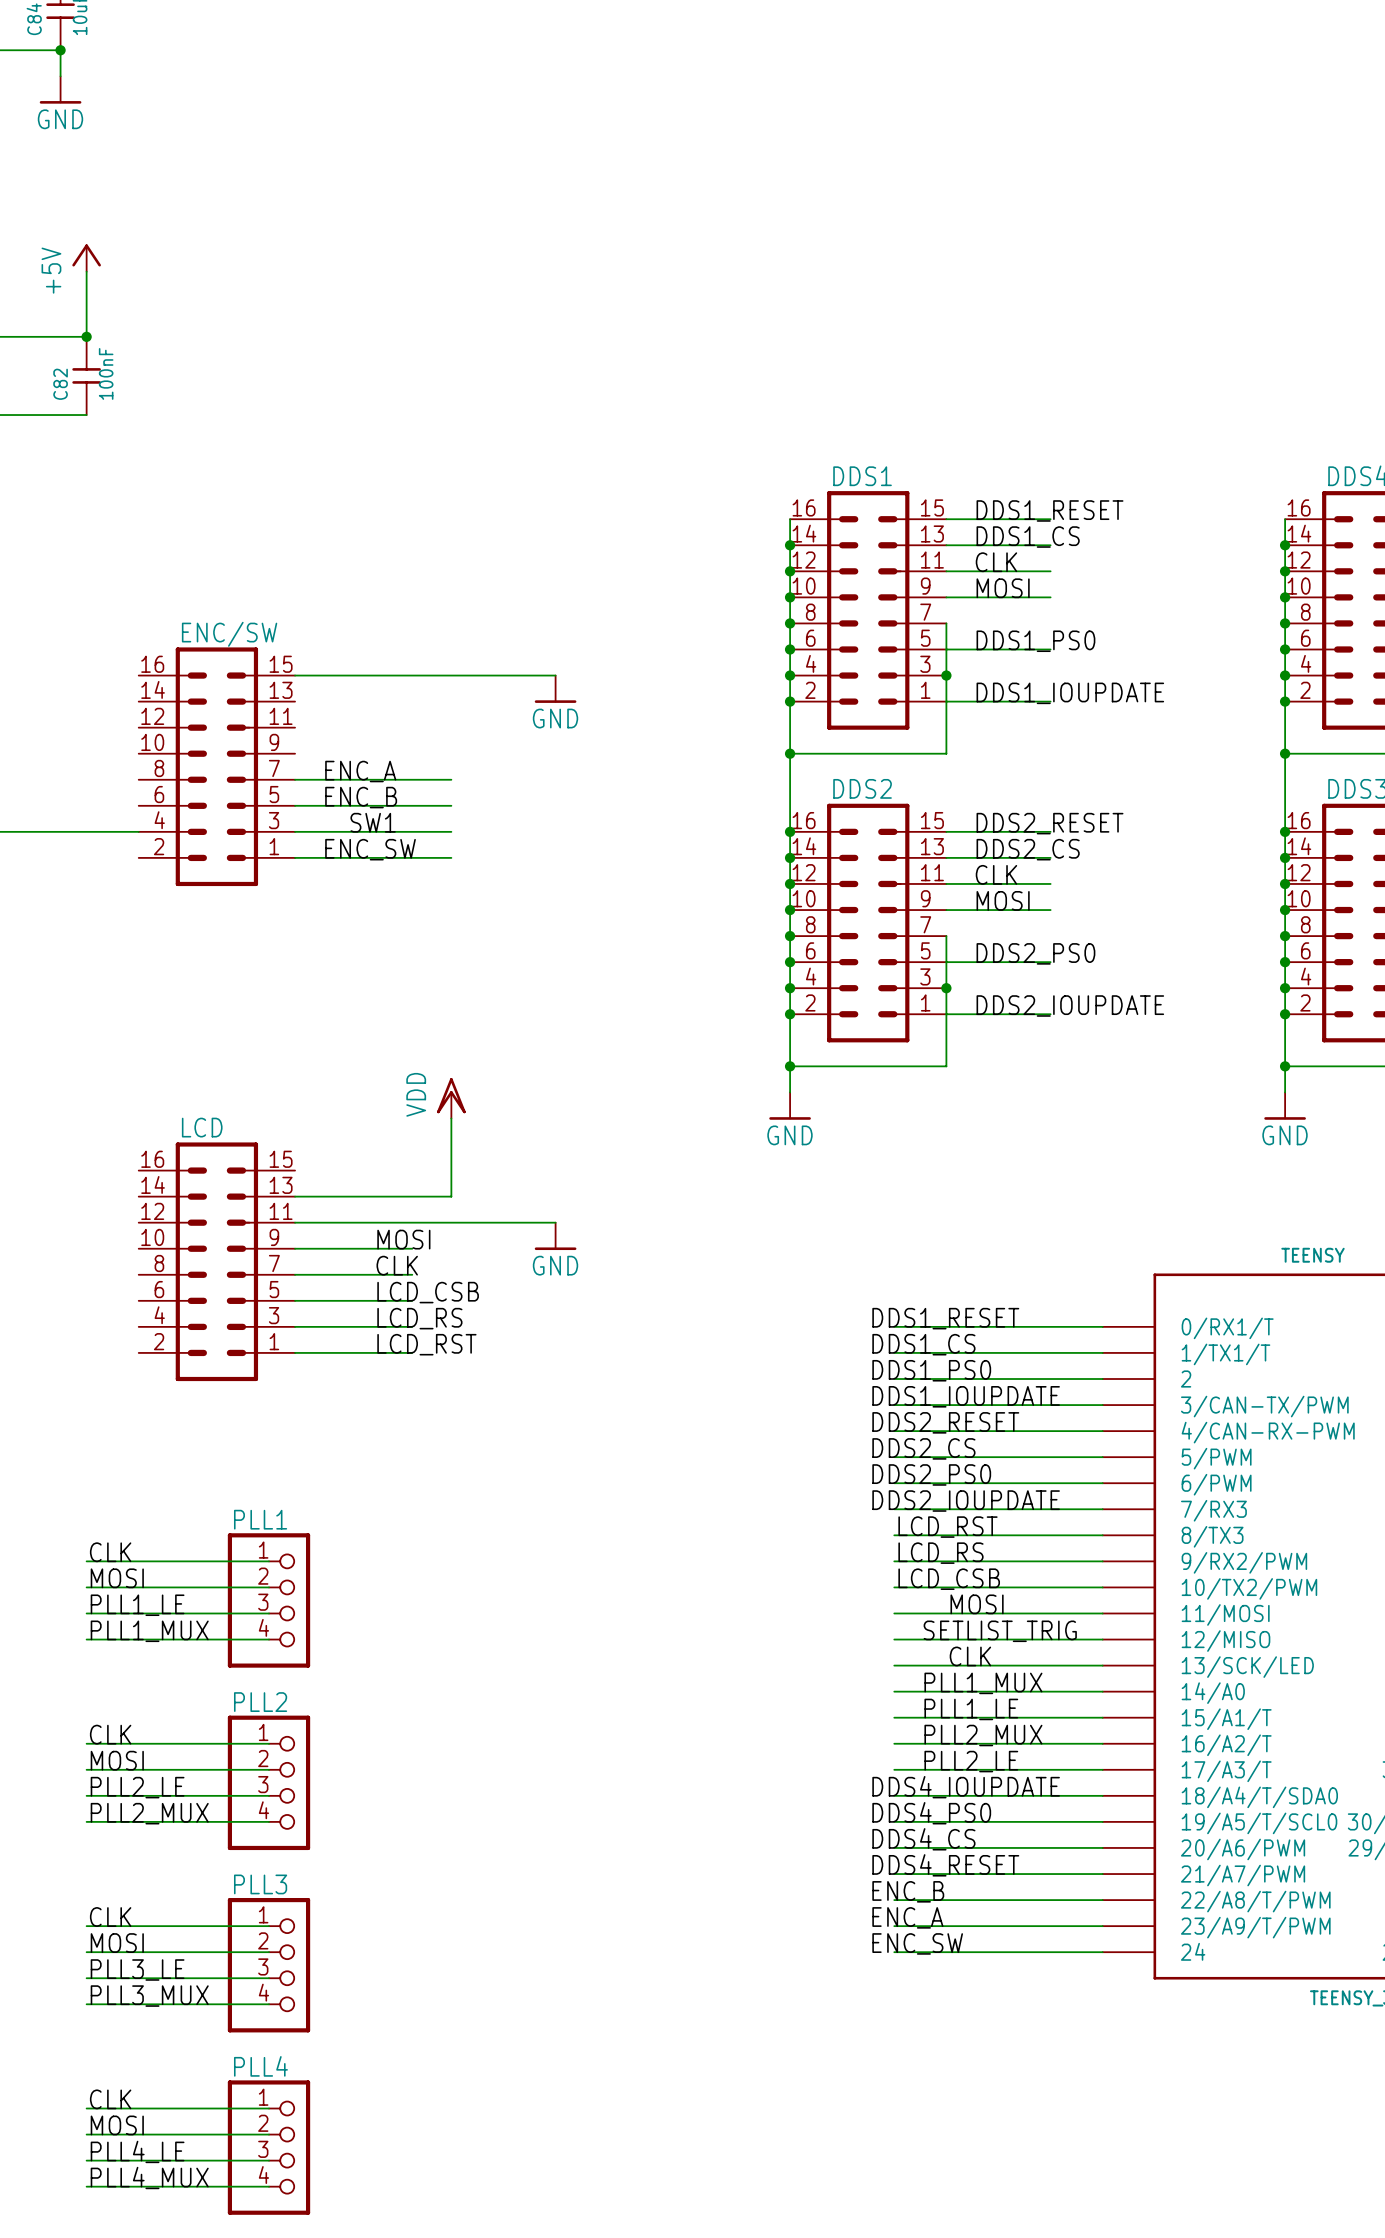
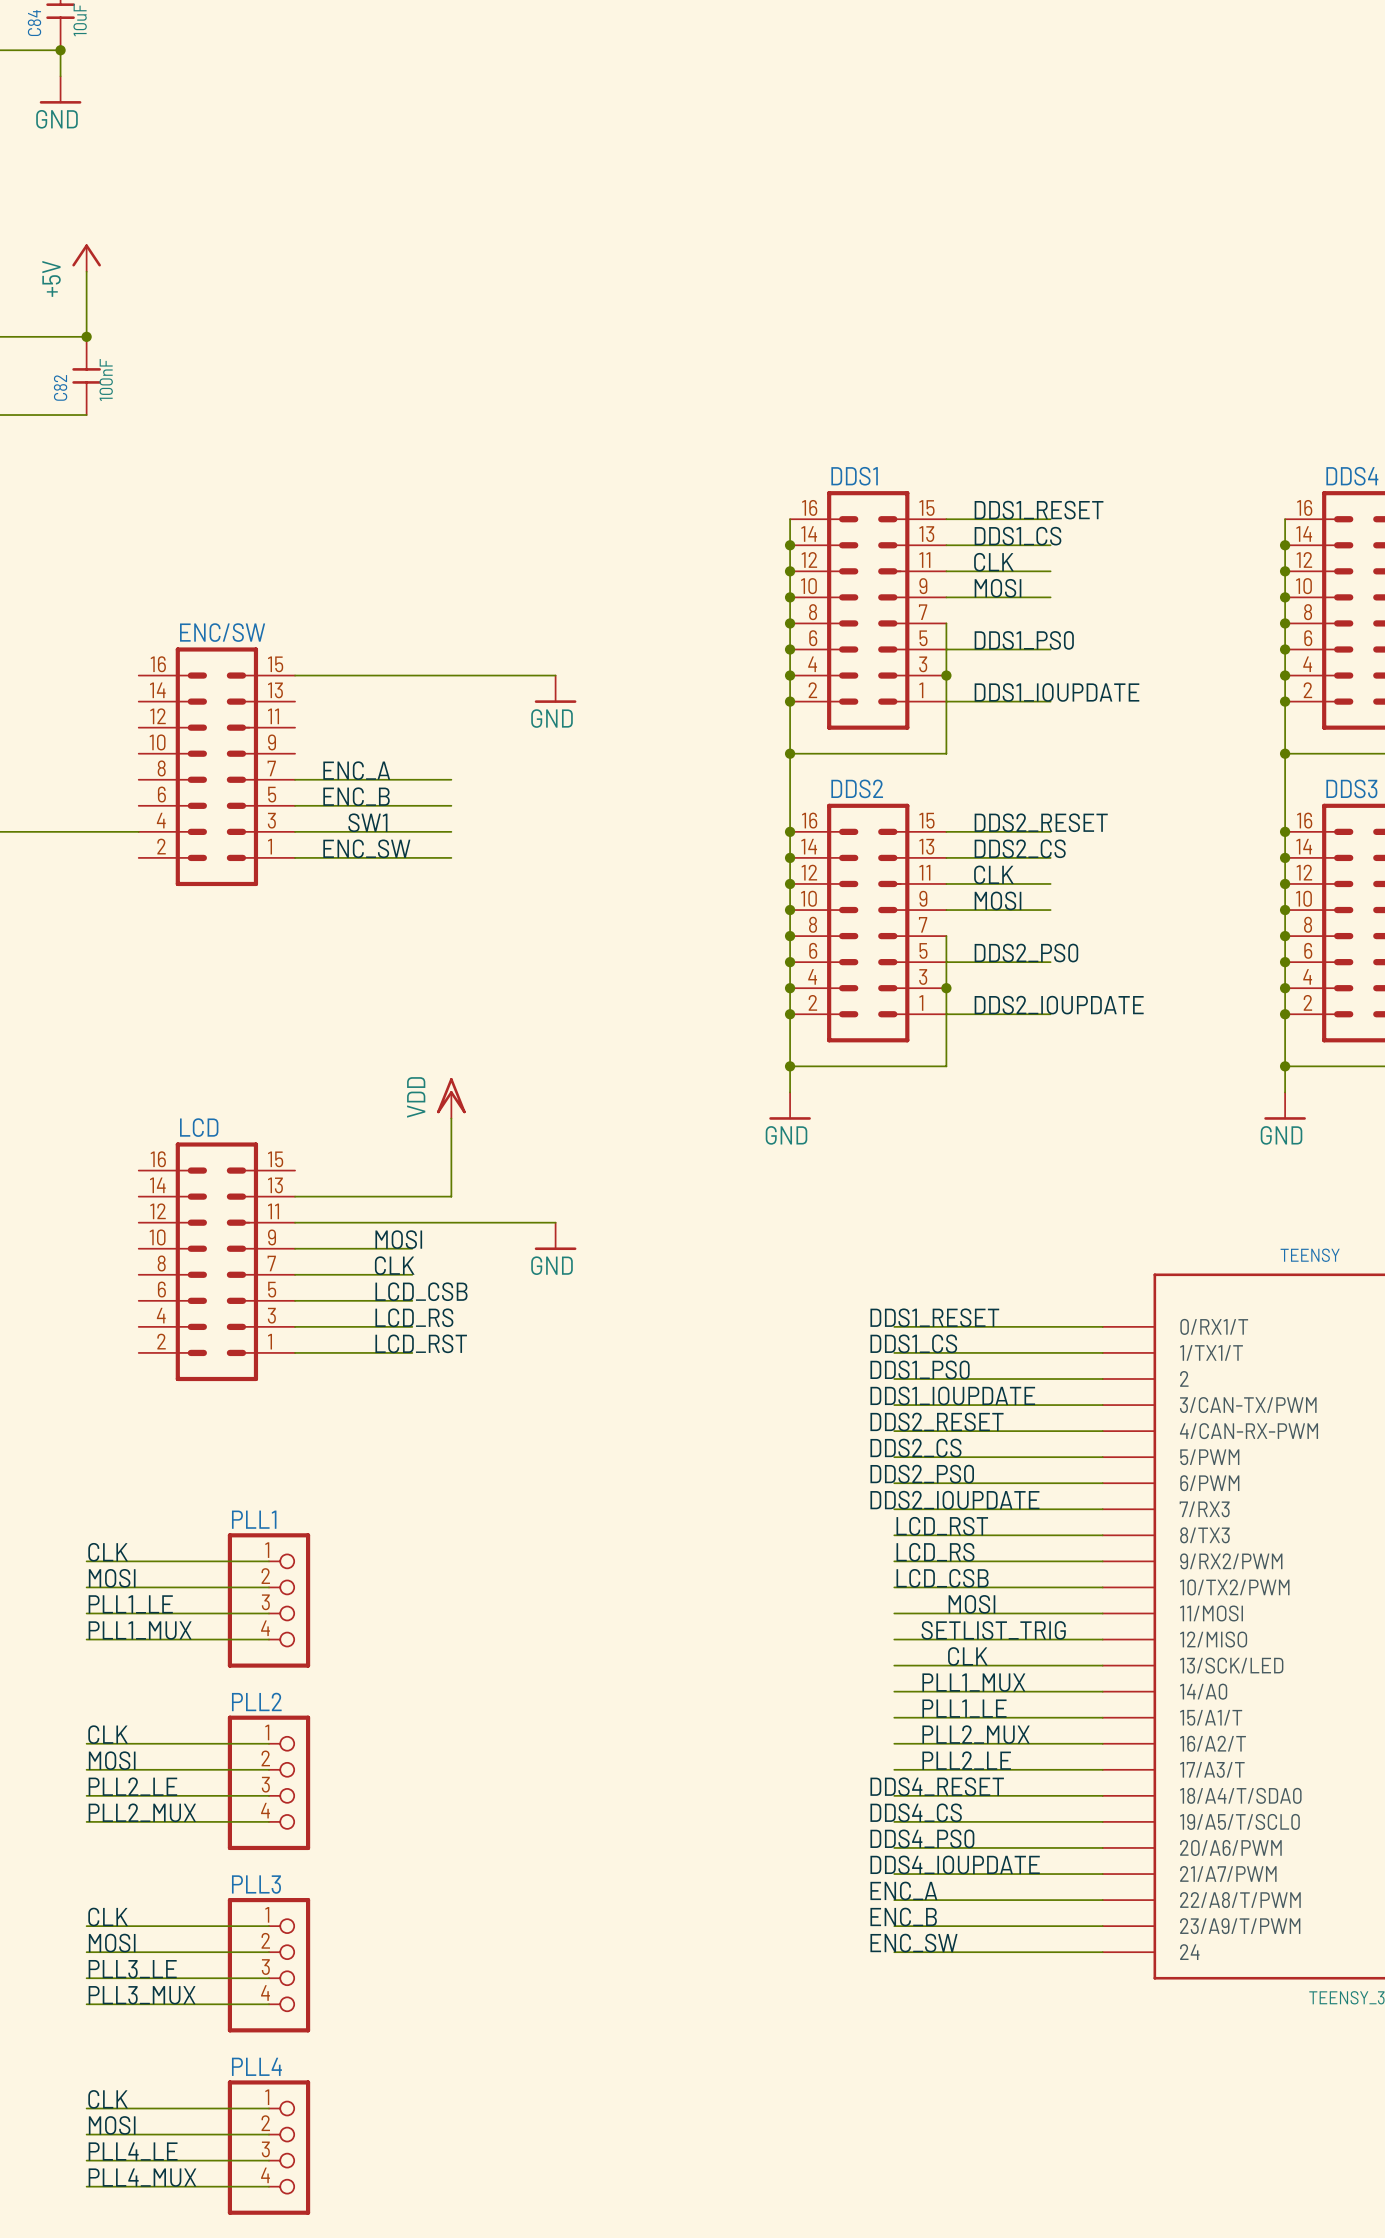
label: DDS4_IOUPDATE (966, 1787) -> DDS4_RESET (937, 1786)
label: DDS4_PS0 (931, 1813) -> DDS4_CS (916, 1812)
label: DDS4_CS (923, 1839) -> DDS4_PS0 (922, 1838)
label: DDS4_RESET (945, 1865) -> DDS4_IOUPDATE (955, 1864)
label: ENC_B (908, 1891) -> ENC_A (903, 1890)
label: ENC_A (907, 1917) -> ENC_B (903, 1917)

